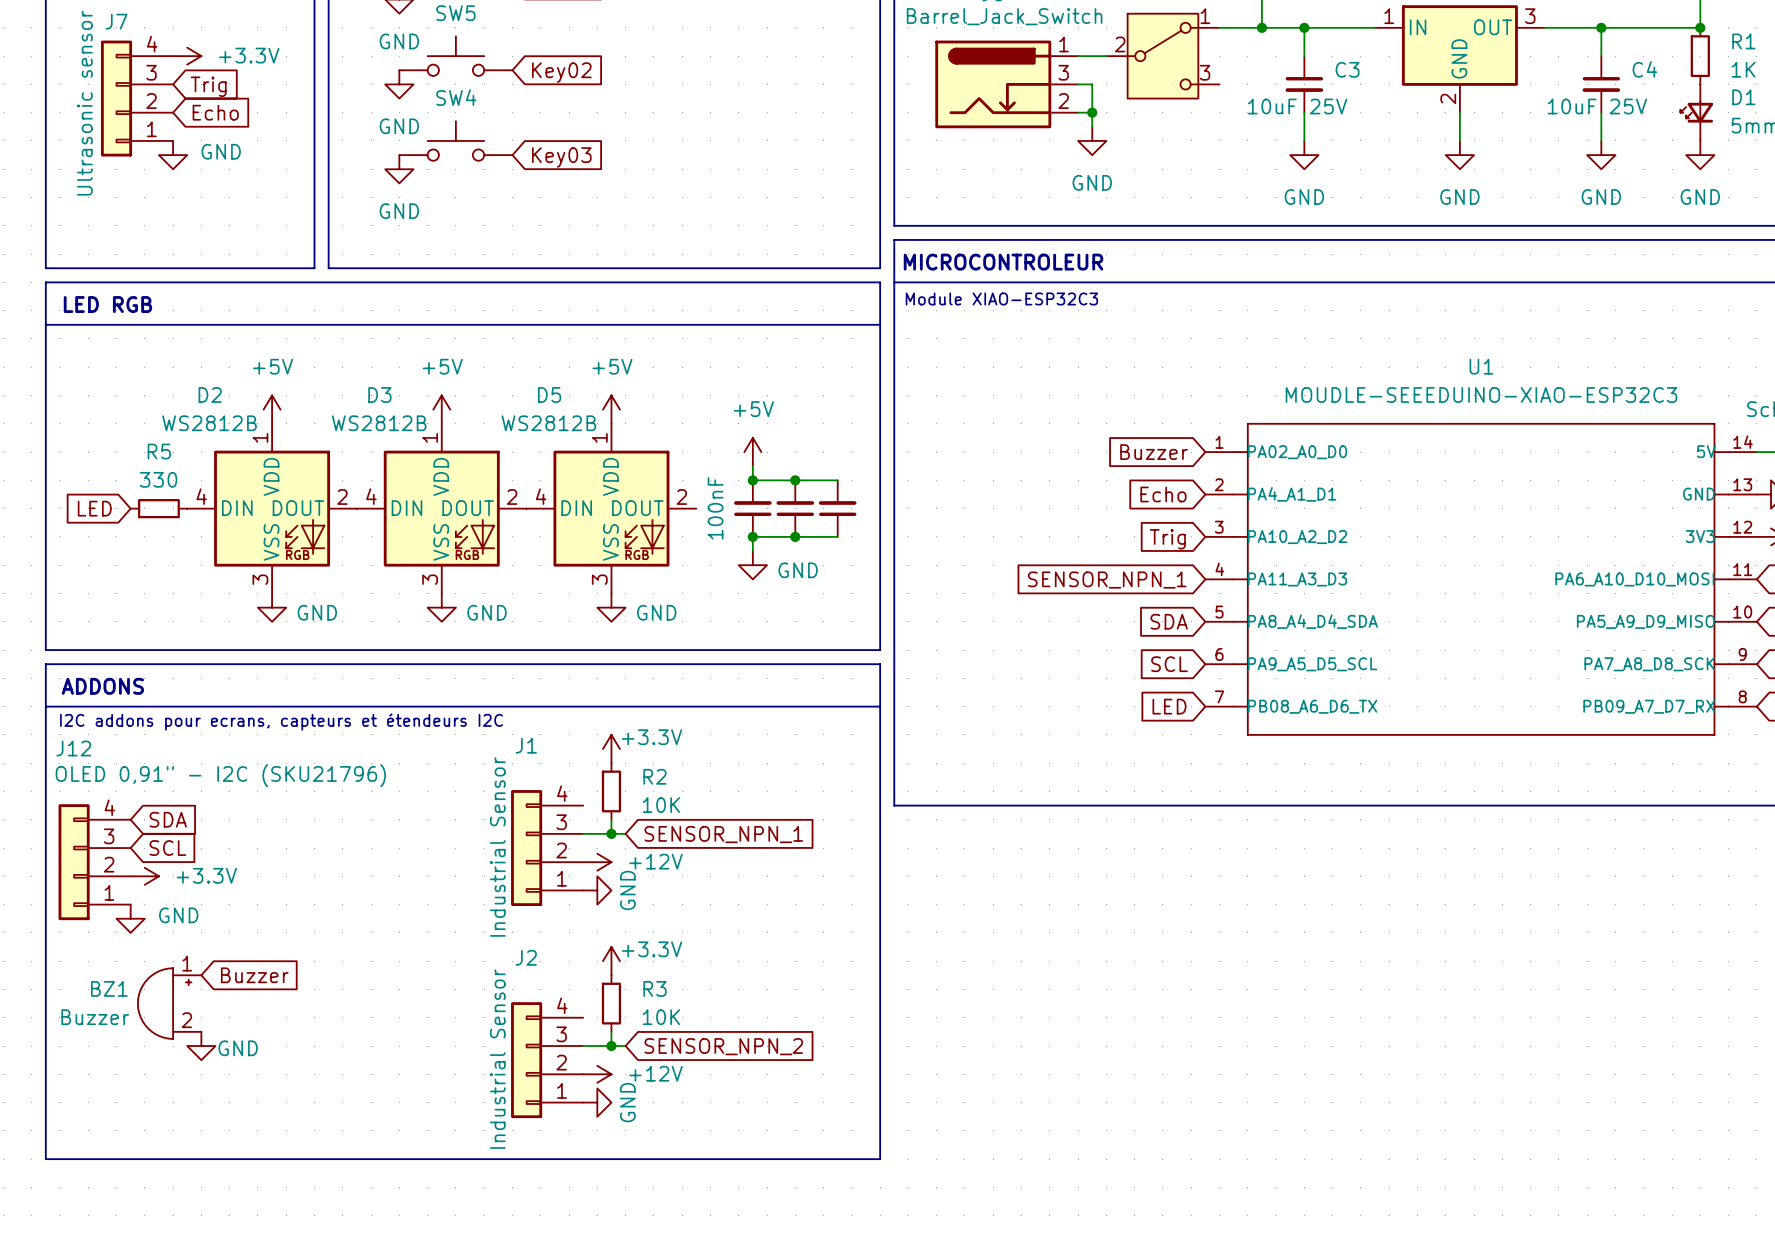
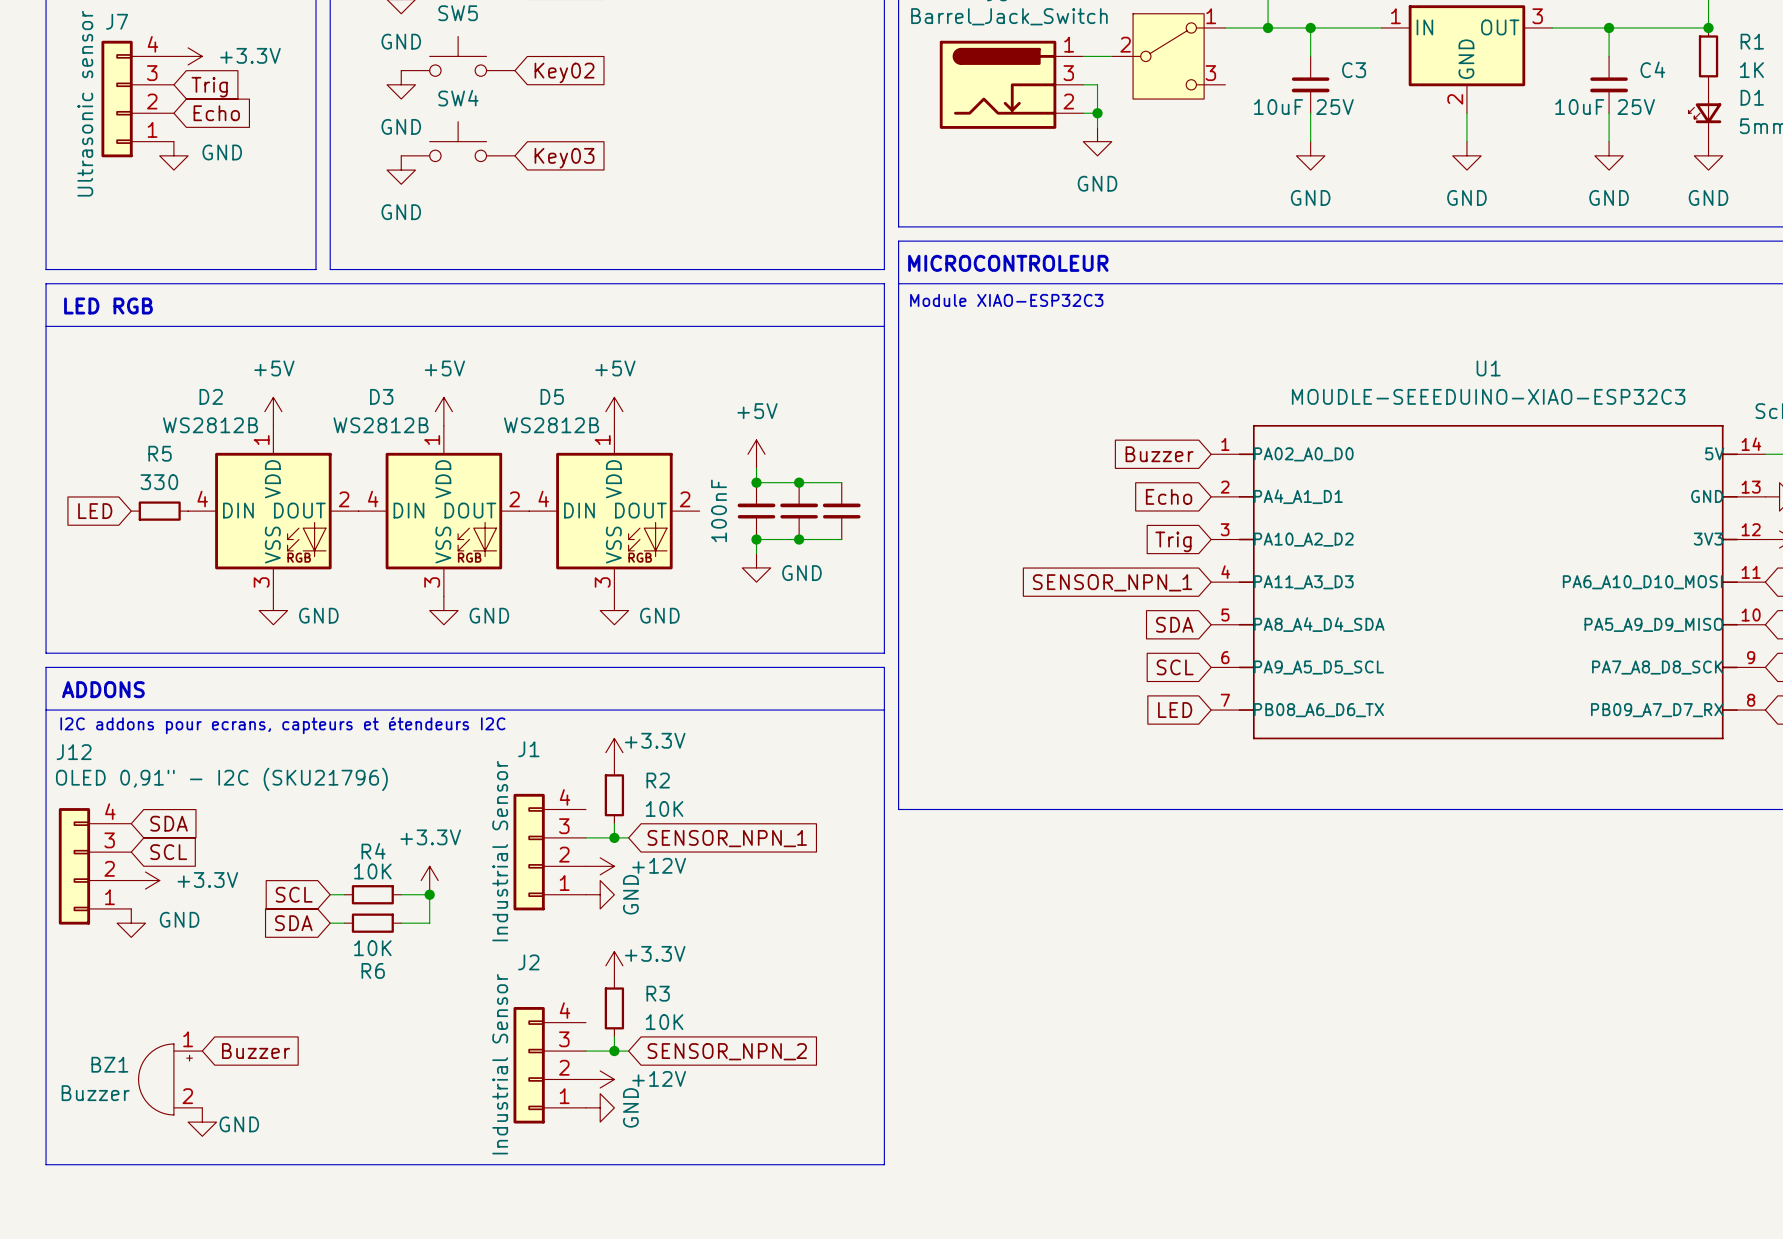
power symbol: none -> +3.3V (429, 880)
global label: none -> SCL (294, 894)
wire: none -> (330, 894) (344, 894)
R4: none -> 10K (372, 894)
wire: none -> (401, 894) (429, 894) (429, 923) (401, 923)
junction: none -> (429, 894)
global label: none -> SDA (293, 923)
wire: none -> (330, 923) (344, 923)
R6: none -> 10K (372, 923)
global label position: Buzzer (254, 975) -> Buzzer (255, 1051)
BZ1 position: (169, 1003) -> (170, 1079)
power symbol position: GND (201, 1046) -> GND (202, 1122)

